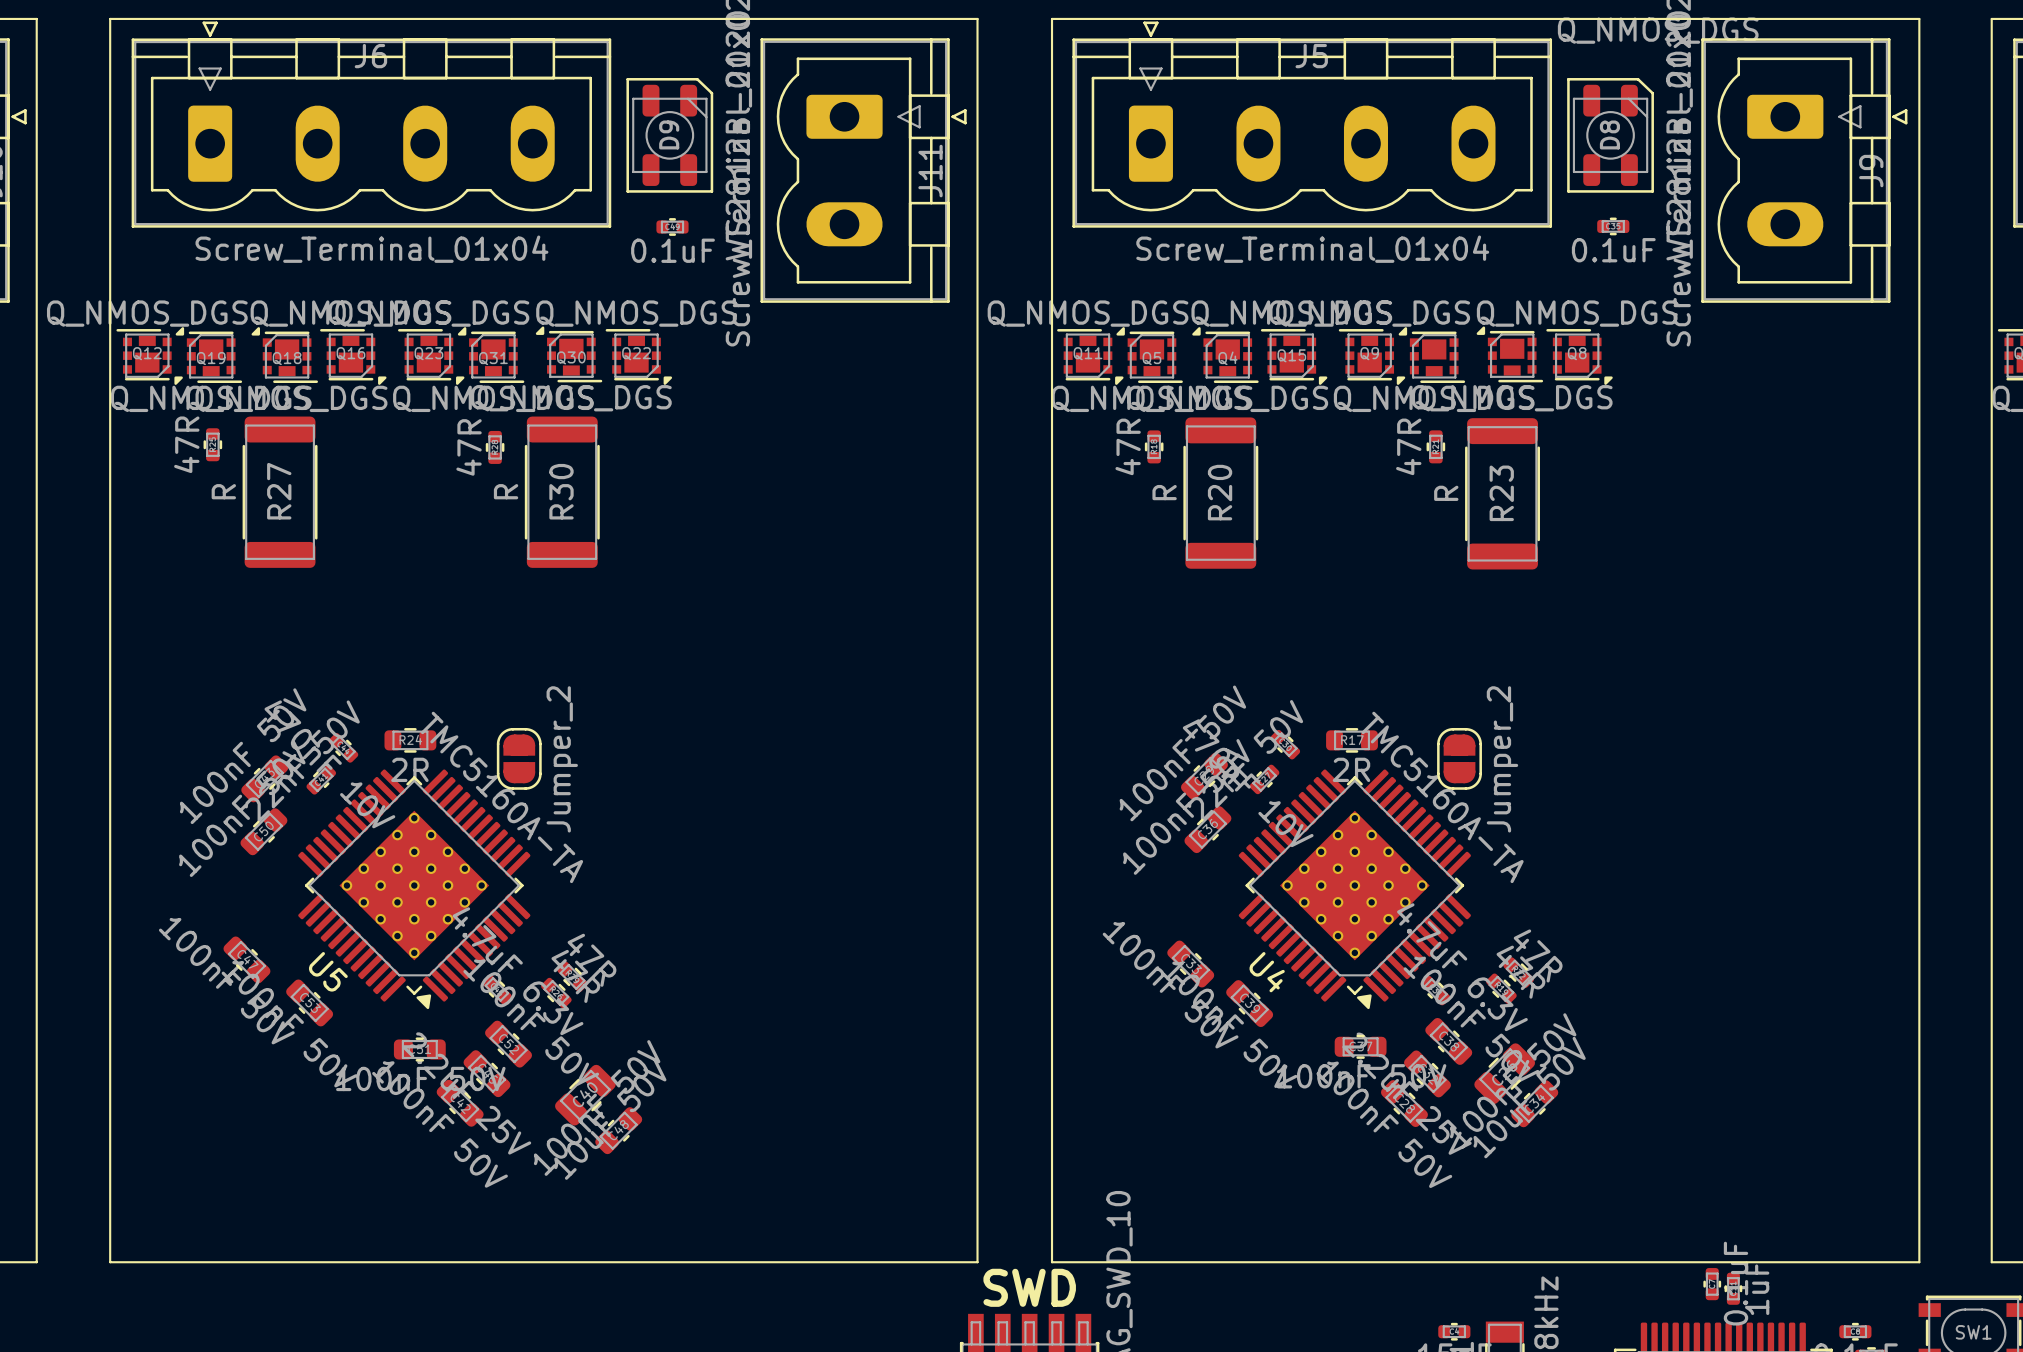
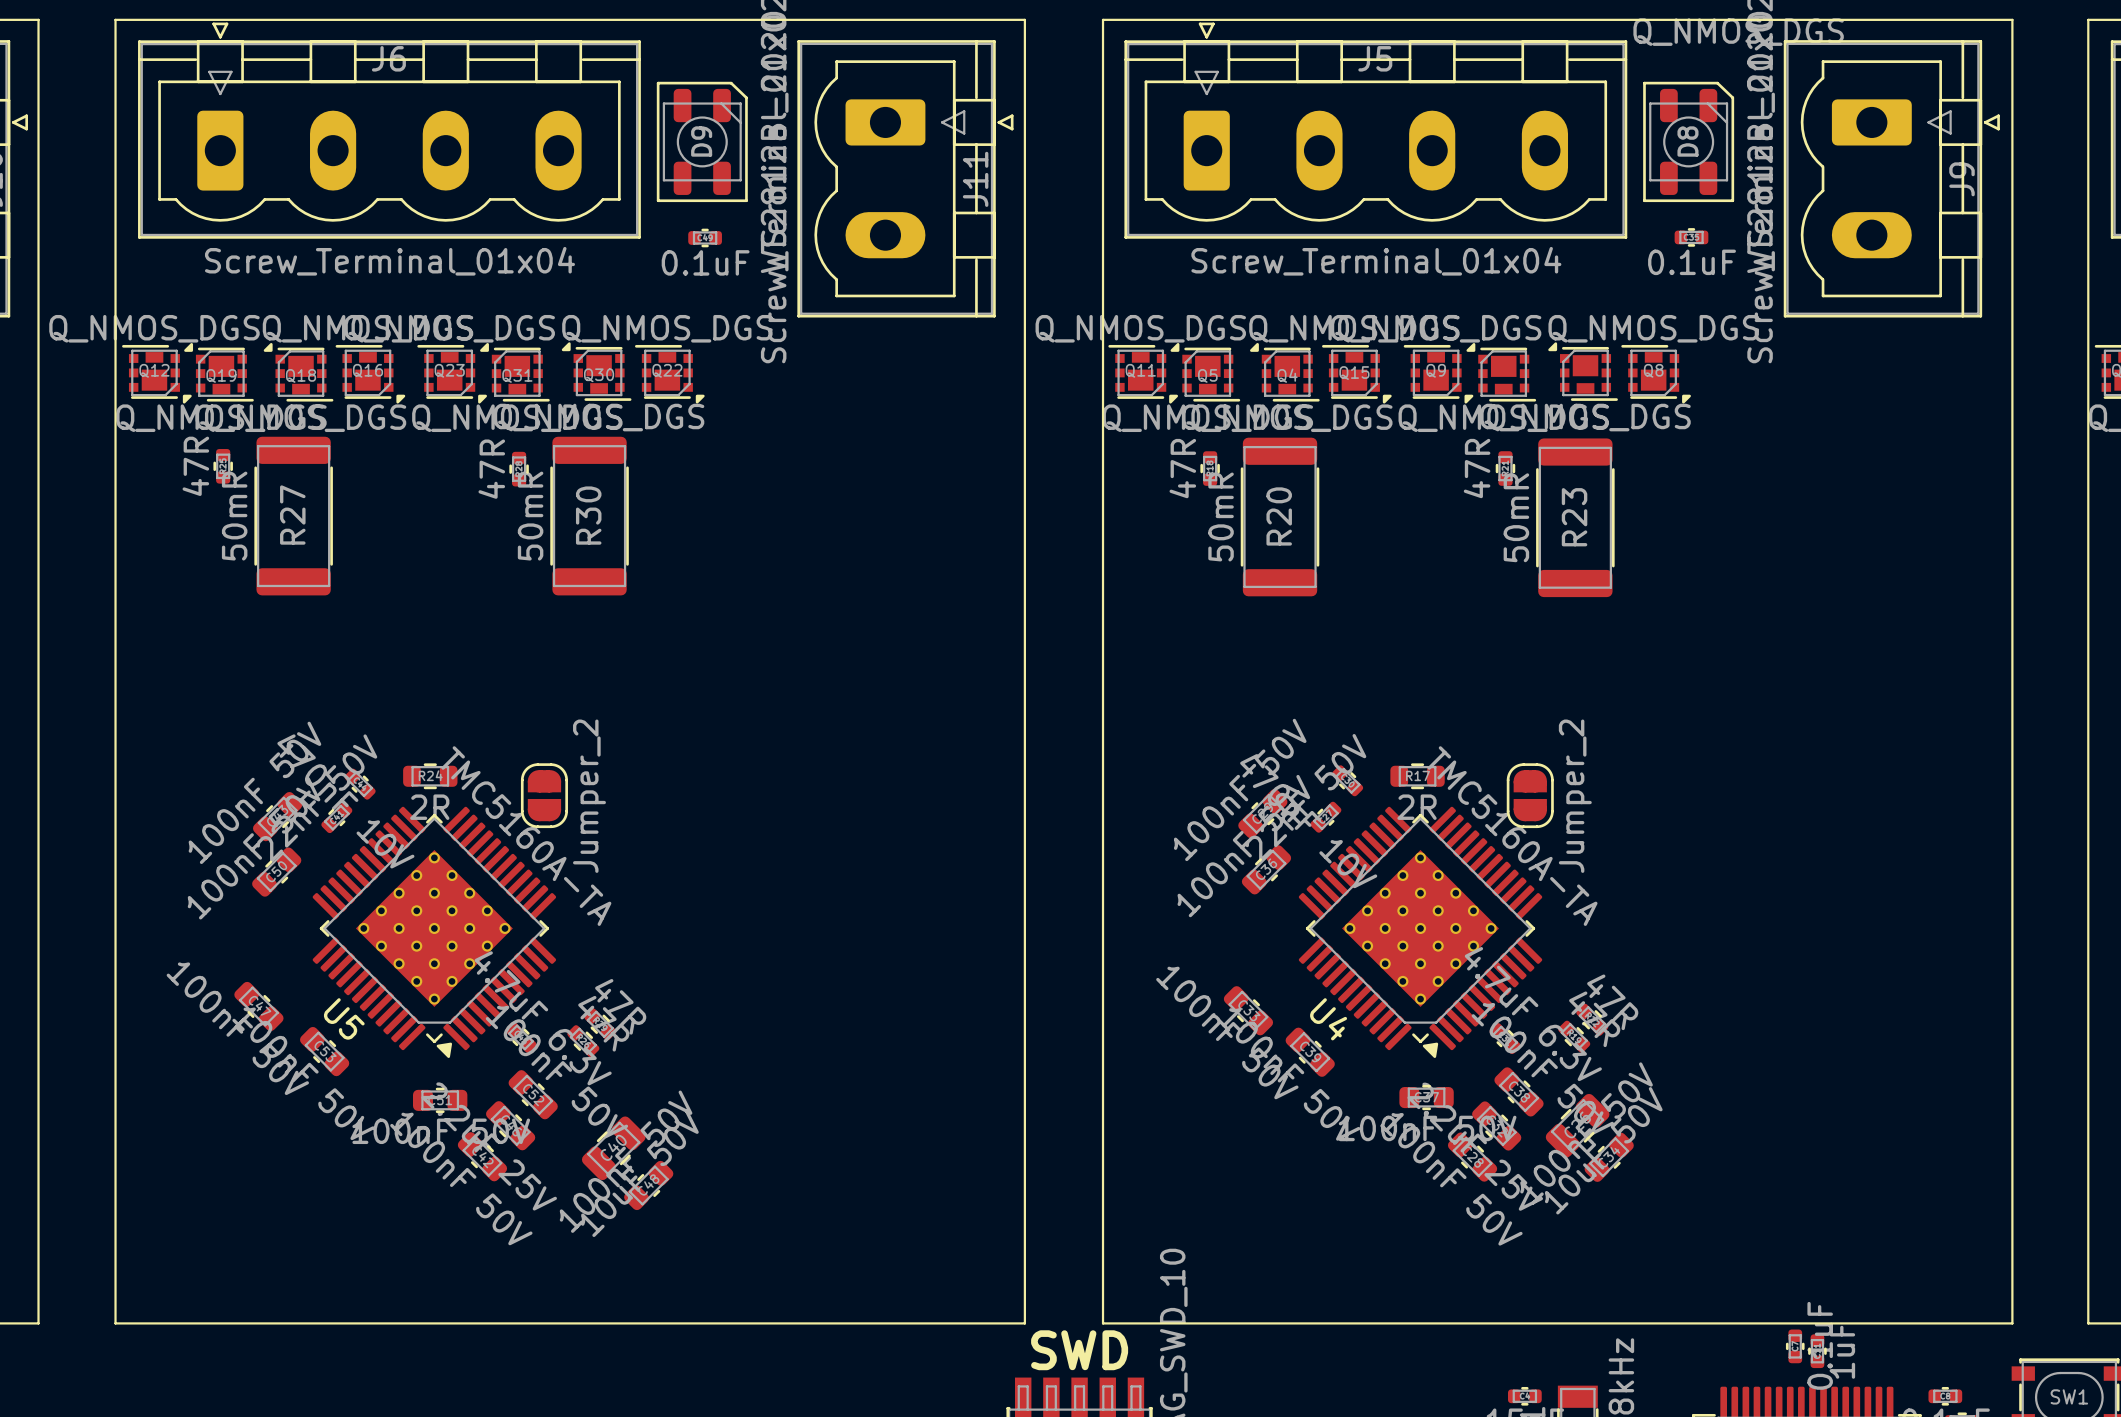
R27 value: R (223, 491) -> 50mR (234, 516)
R30 value: R (506, 491) -> 50mR (530, 516)
R20 value: R (1164, 492) -> 50mR (1221, 517)
R23 value: R (1446, 493) -> 50mR (1516, 517)

